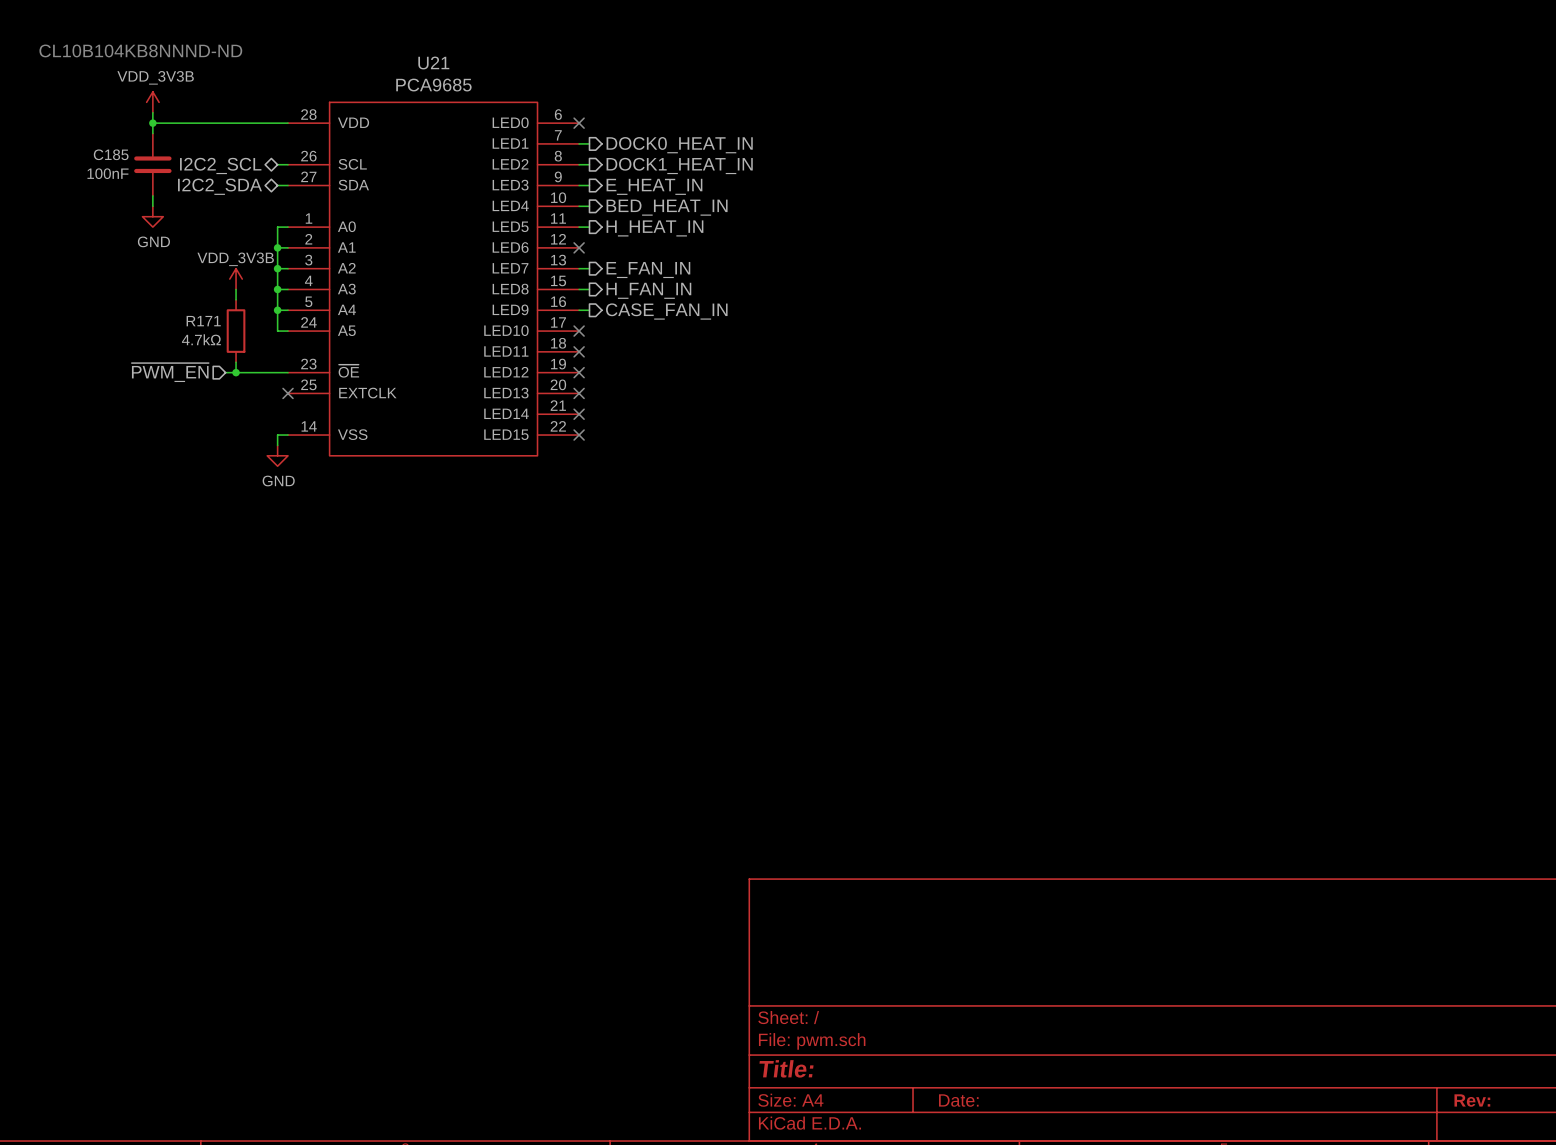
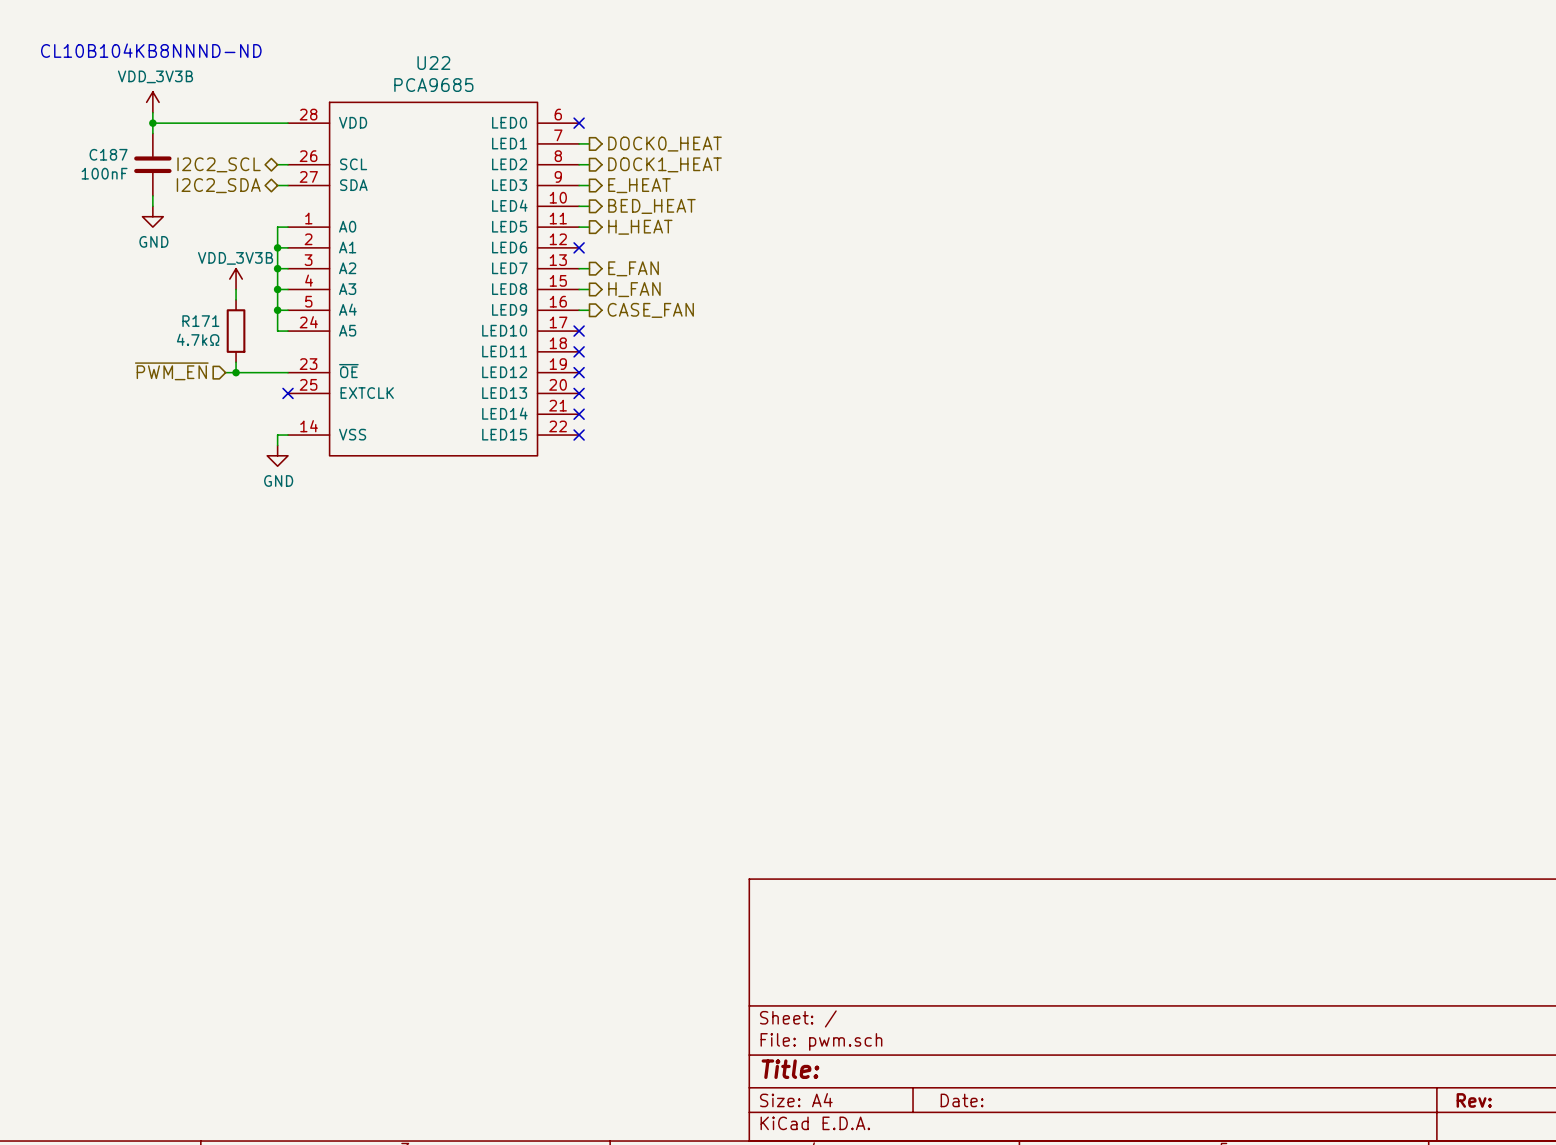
U21 name: U21 (433, 63) -> U22 (433, 63)
hierarchical label: DOCK0_HEAT_IN (679, 145) -> DOCK0_HEAT (665, 144)
C185 name: C185 (111, 154) -> C187 (108, 154)
hierarchical label: DOCK1_HEAT_IN (679, 165) -> DOCK1_HEAT (665, 164)
hierarchical label: E_HEAT_IN (654, 186) -> E_HEAT (639, 185)
hierarchical label: BED_HEAT_IN (667, 207) -> BED_HEAT (651, 206)
hierarchical label: H_HEAT_IN (654, 228) -> H_HEAT (640, 227)
hierarchical label: E_FAN_IN (648, 270) -> E_FAN (633, 268)
hierarchical label: H_FAN_IN (648, 290) -> H_FAN (634, 289)
hierarchical label: CASE_FAN_IN (666, 311) -> CASE_FAN (650, 310)

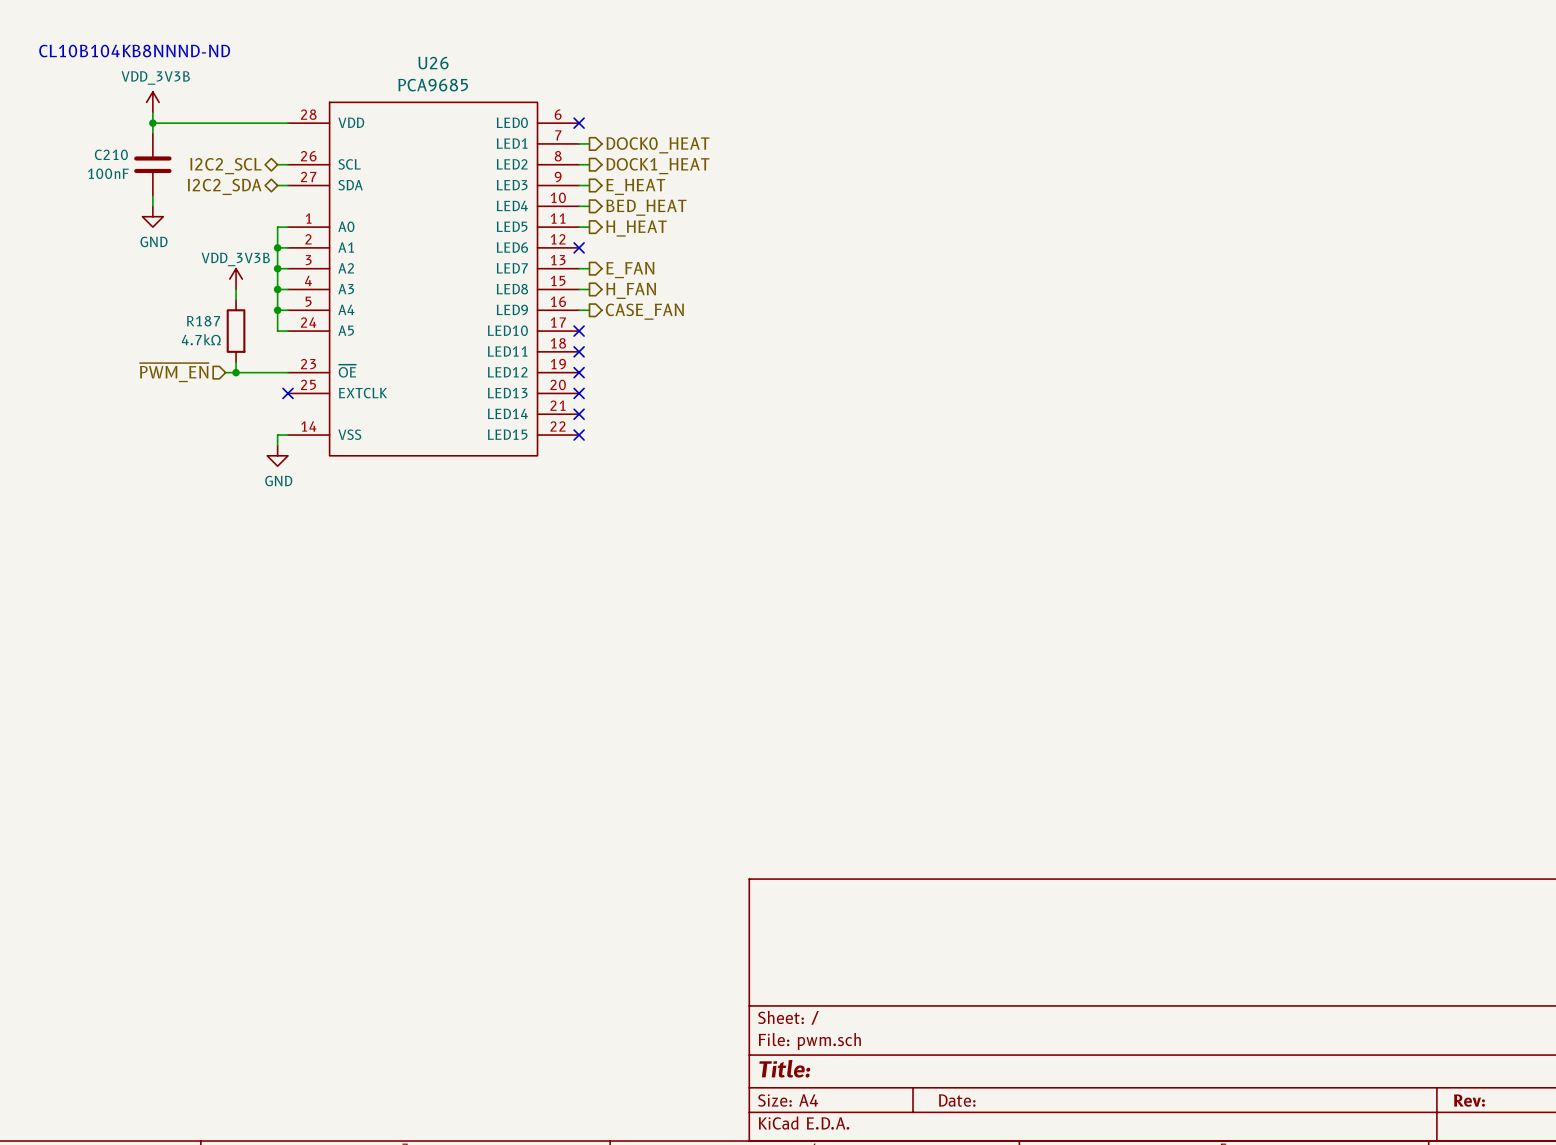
U22 name: U22 (433, 63) -> U26 (433, 63)
C187 name: C187 (108, 154) -> C210 (111, 154)
R171 name: R171 (200, 321) -> R187 (203, 321)

